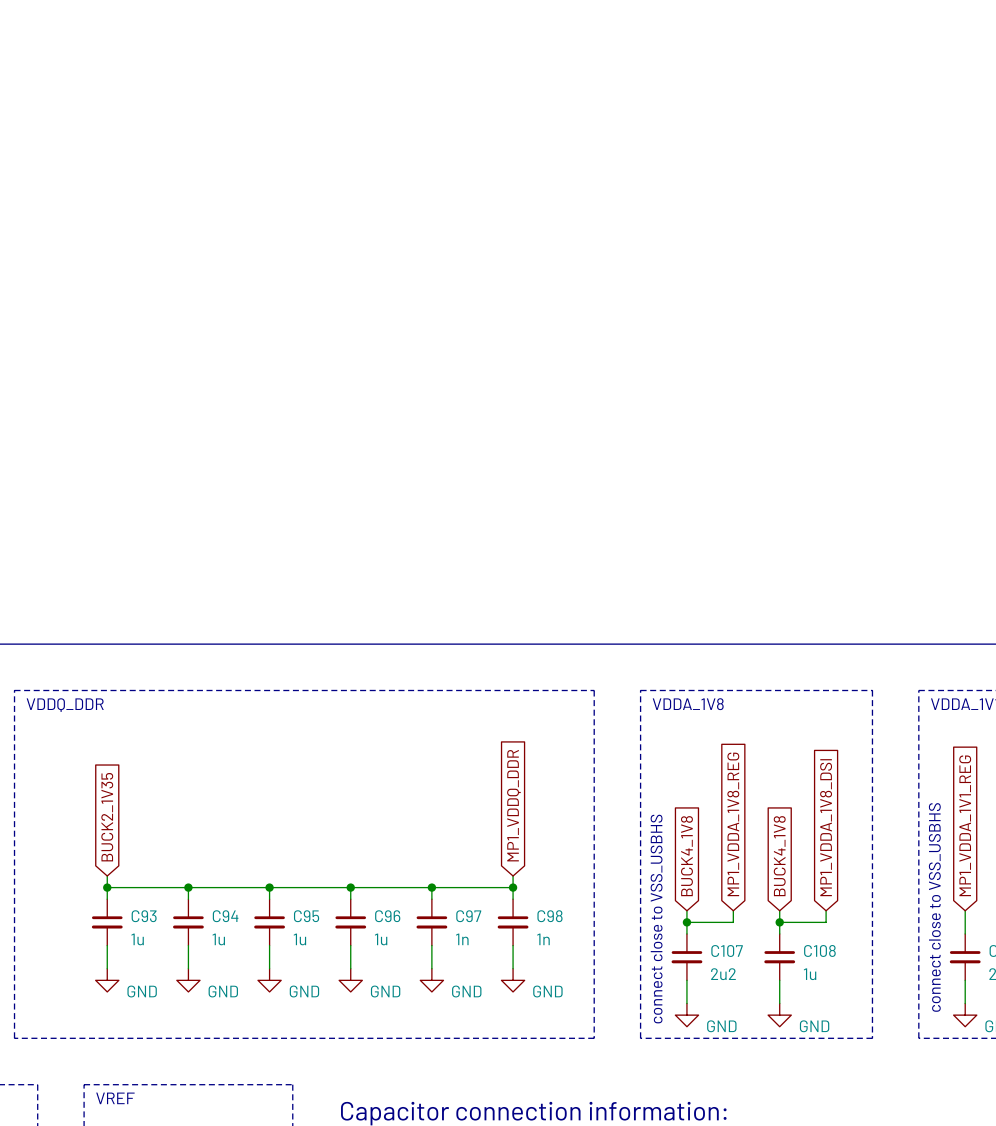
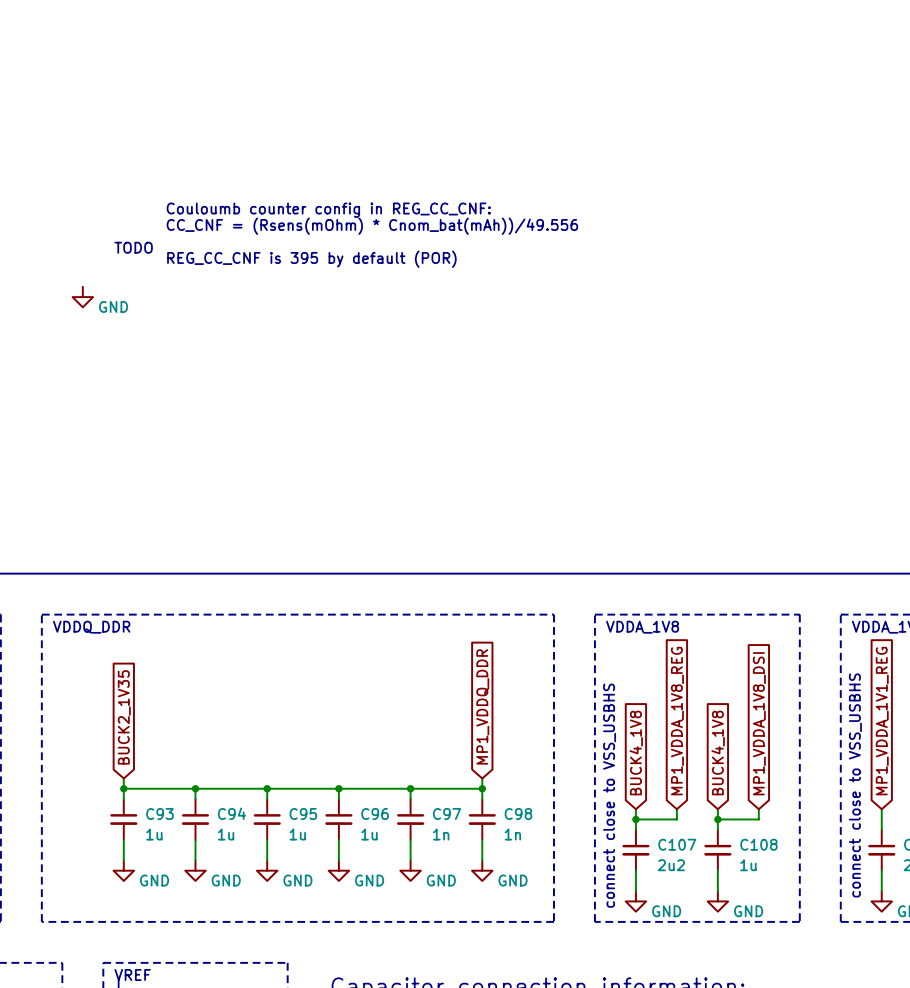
text: none -> Couloumb counter config in REG_CC_CNF: (328, 210)
text: none -> CC_CNF = (Rsens(mOhm) * Cnom_bat(mAh))/49.556 (372, 226)
text: none -> TODO (133, 247)
text: none -> REG_CC_CNF is 395 by default (POR) (311, 259)
power symbol: none -> GND (82, 297)

